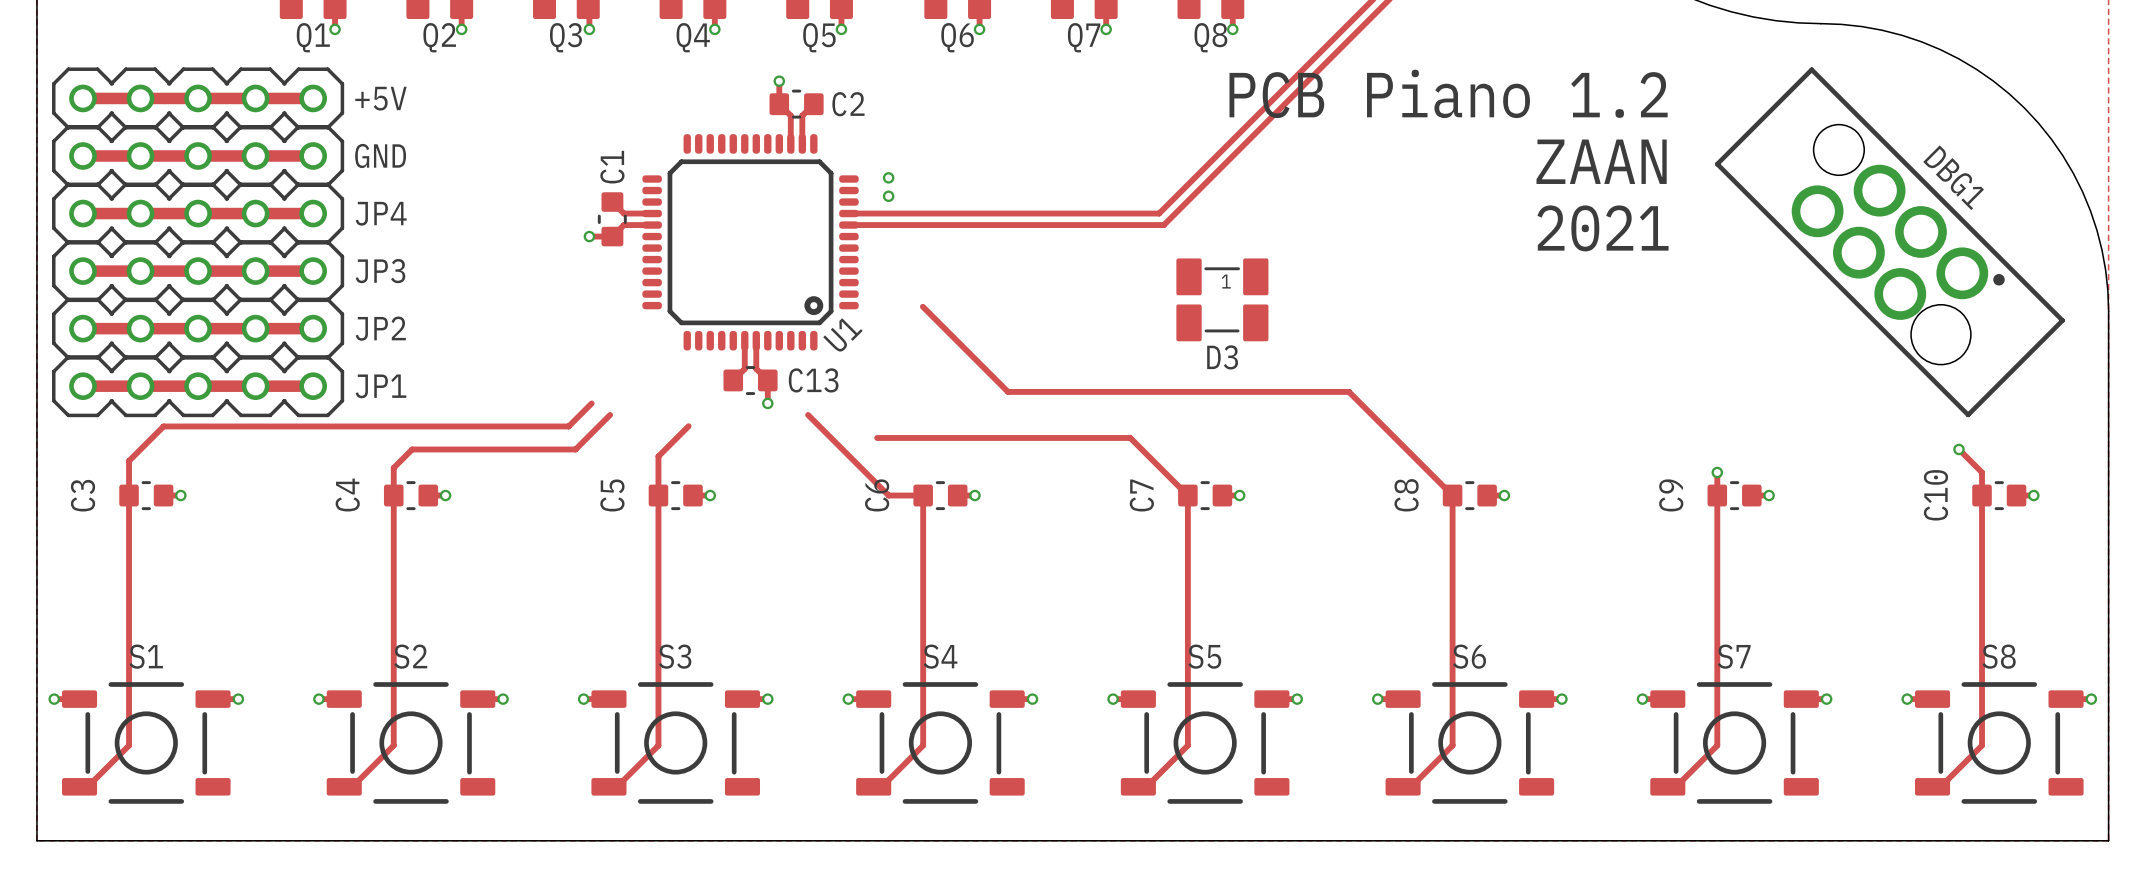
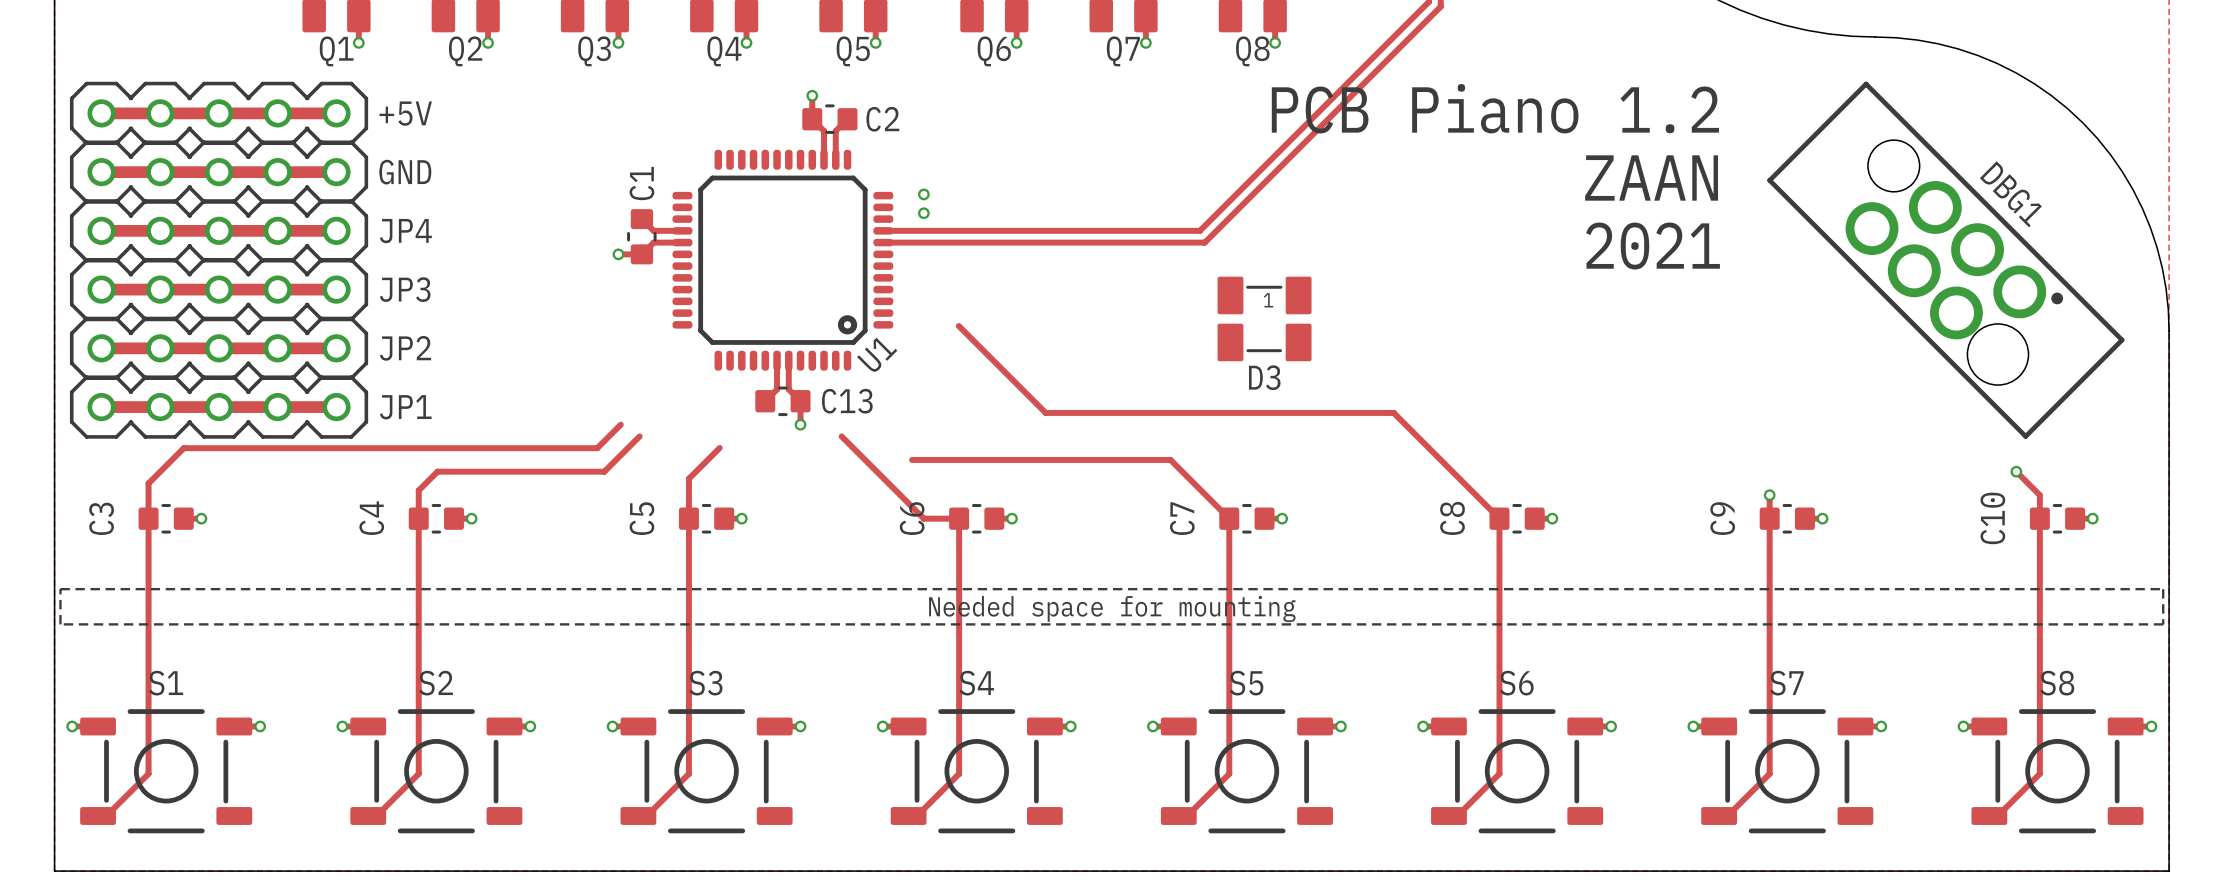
line: none -> (60, 589) (60, 624) (2163, 624) (2163, 589) (60, 589)
text: none -> Needed space for mounting (1112, 608)

